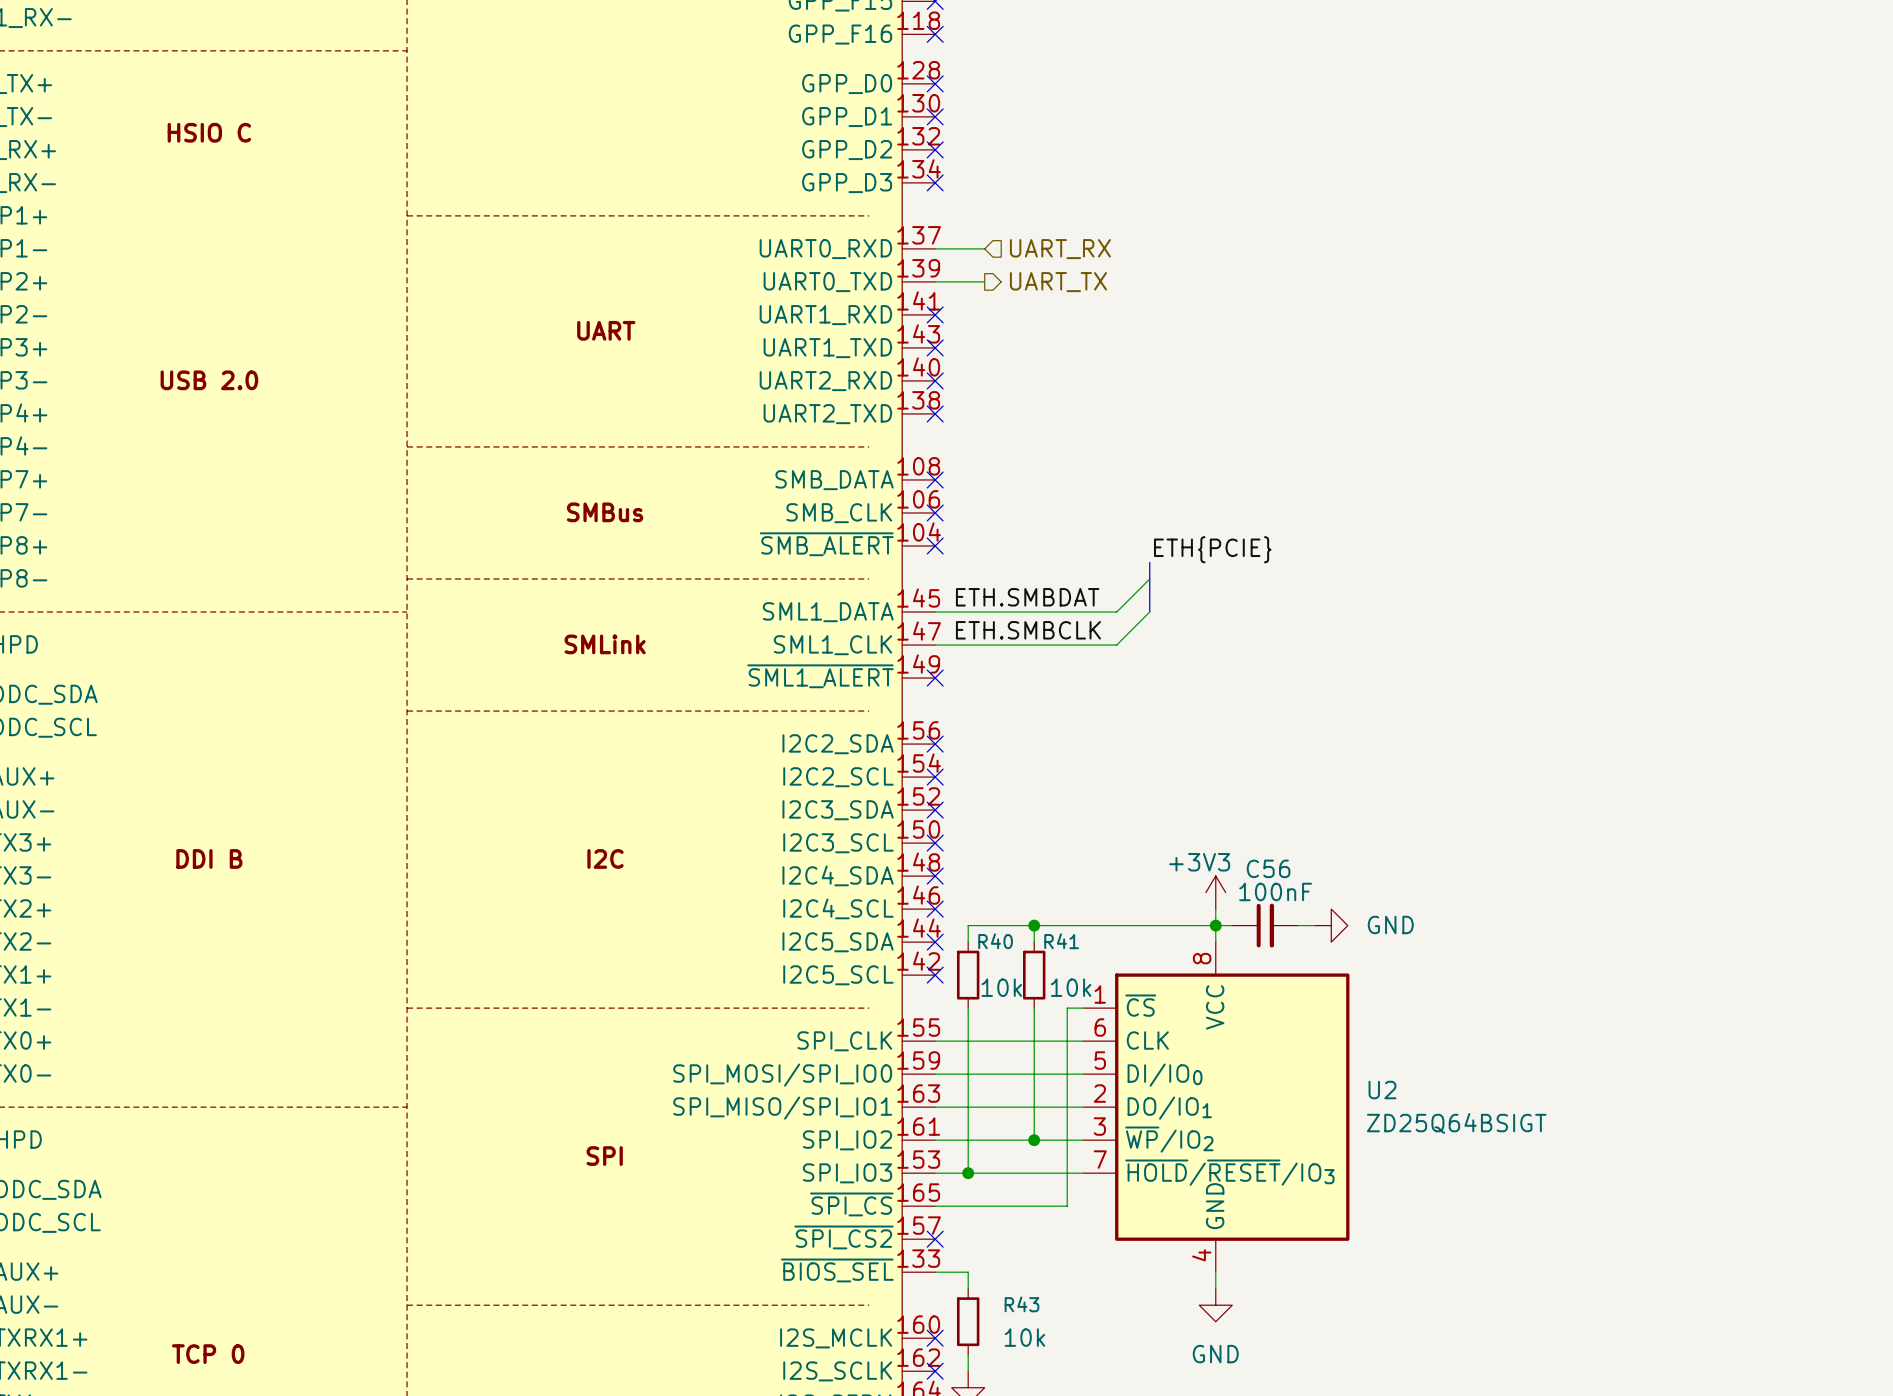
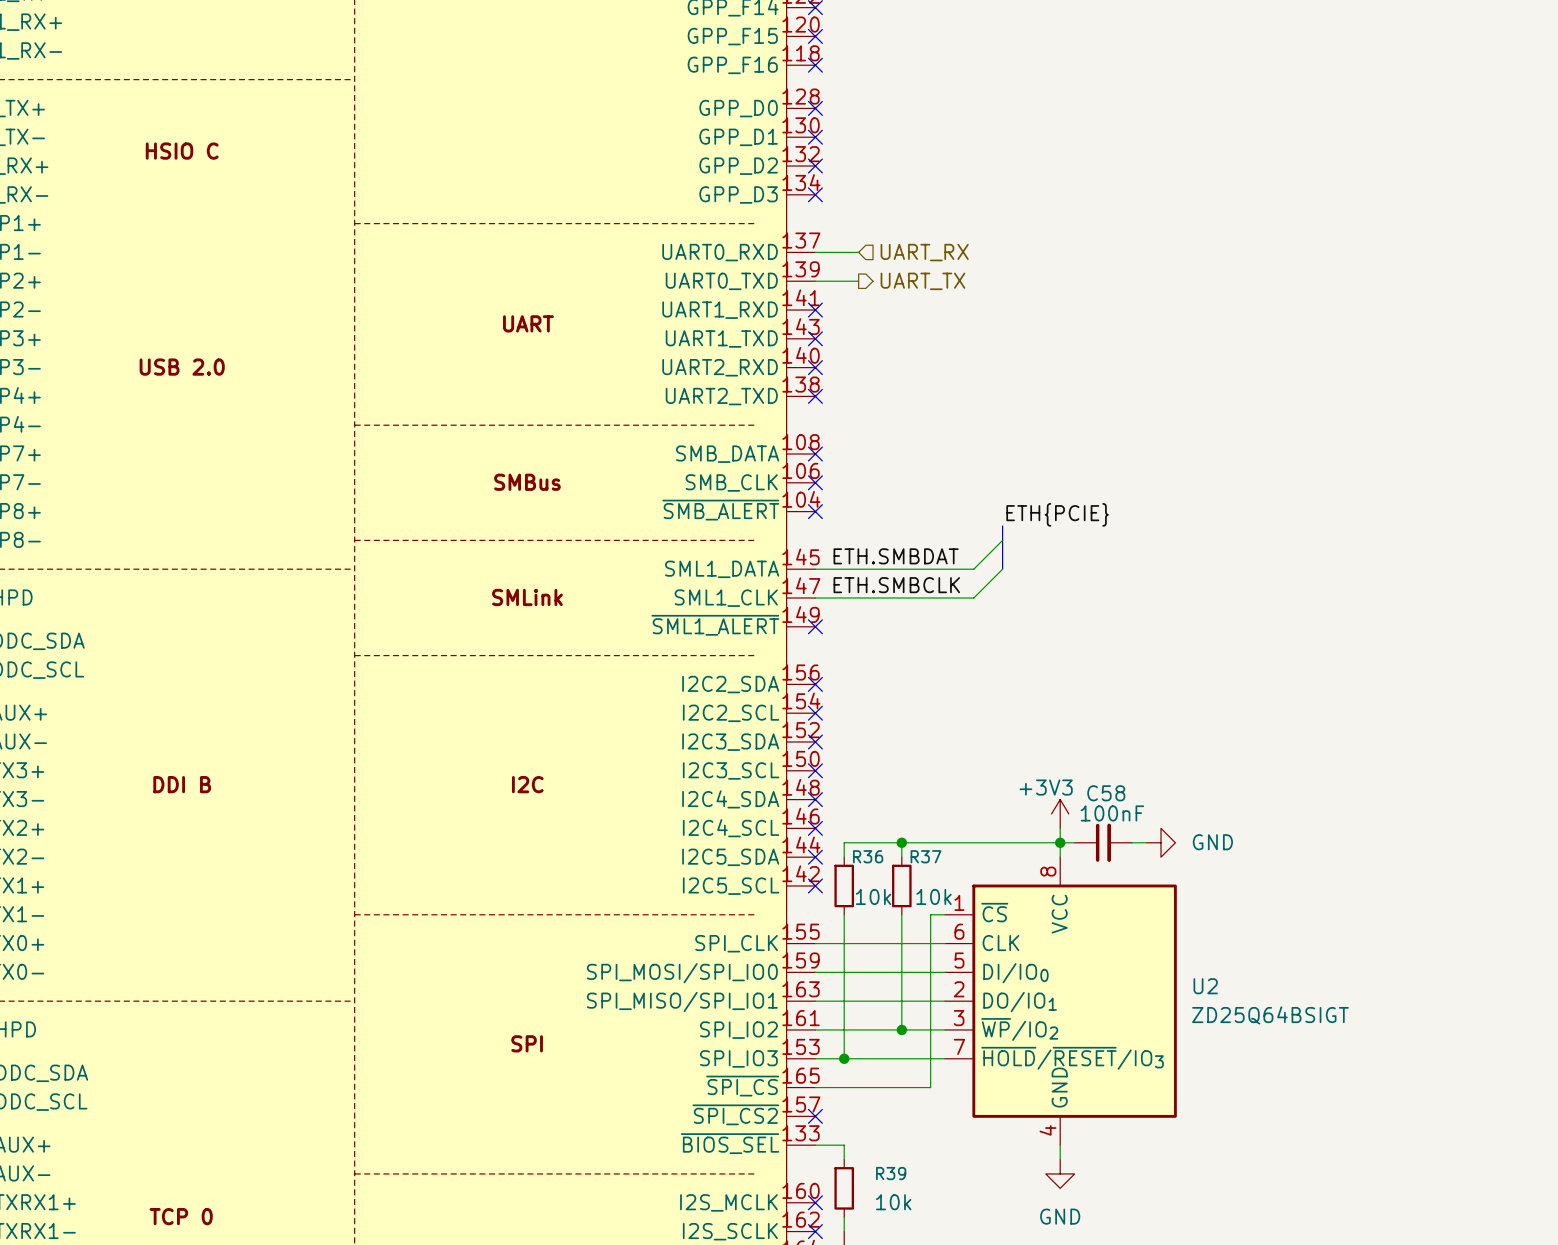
C56 name: C56 (1268, 868) -> C58 (1106, 793)
R40 name: R40 (995, 941) -> R36 (868, 856)
R41 name: R41 (1061, 941) -> R37 (925, 856)
R43 name: R43 (1022, 1304) -> R39 (891, 1173)

